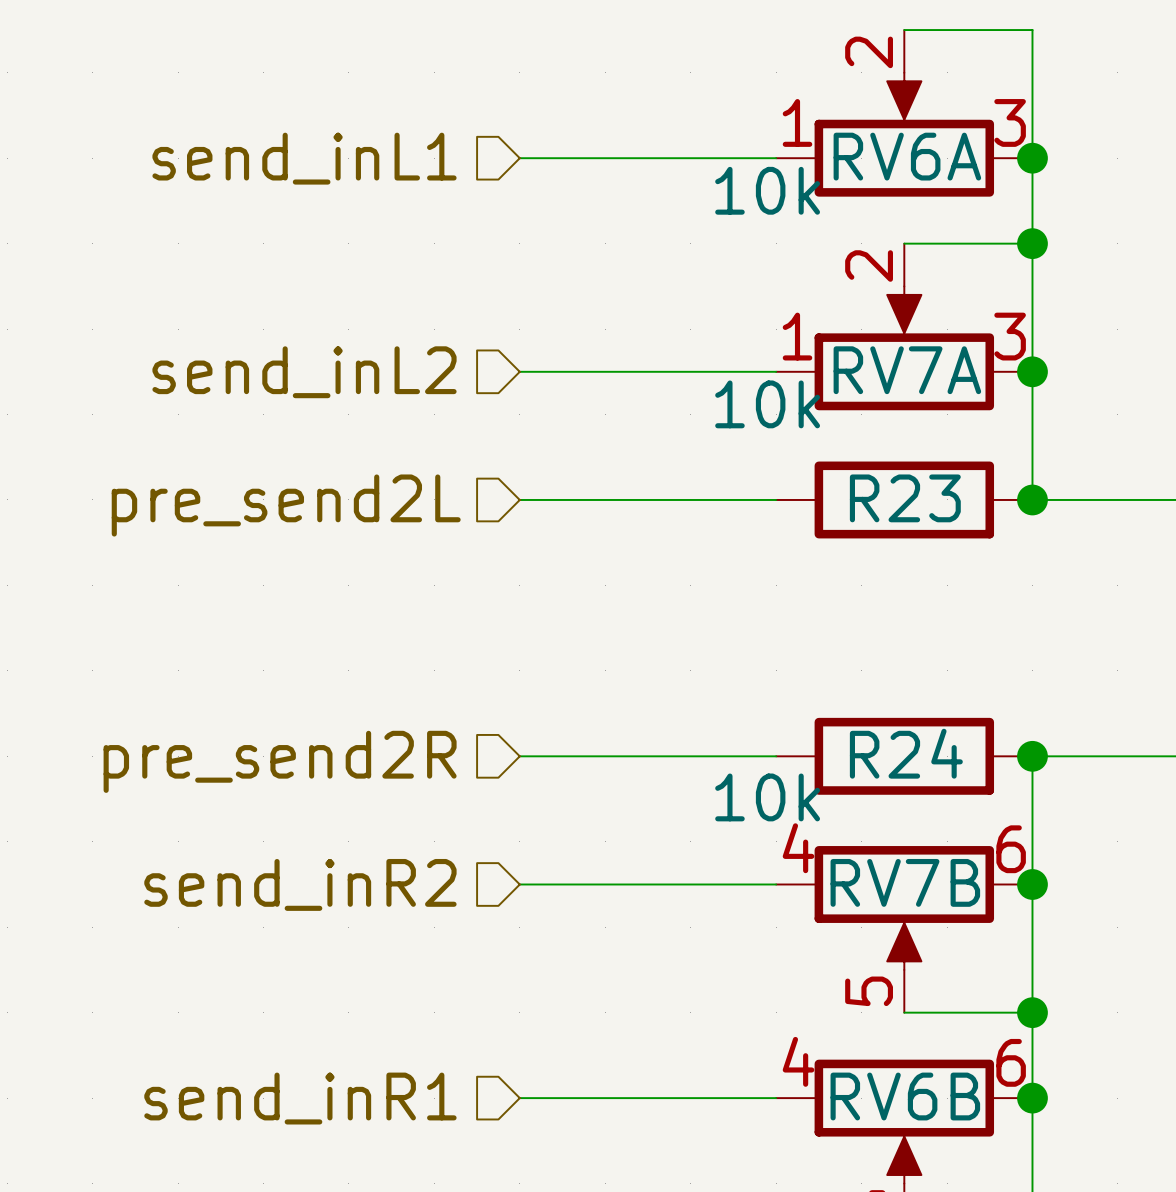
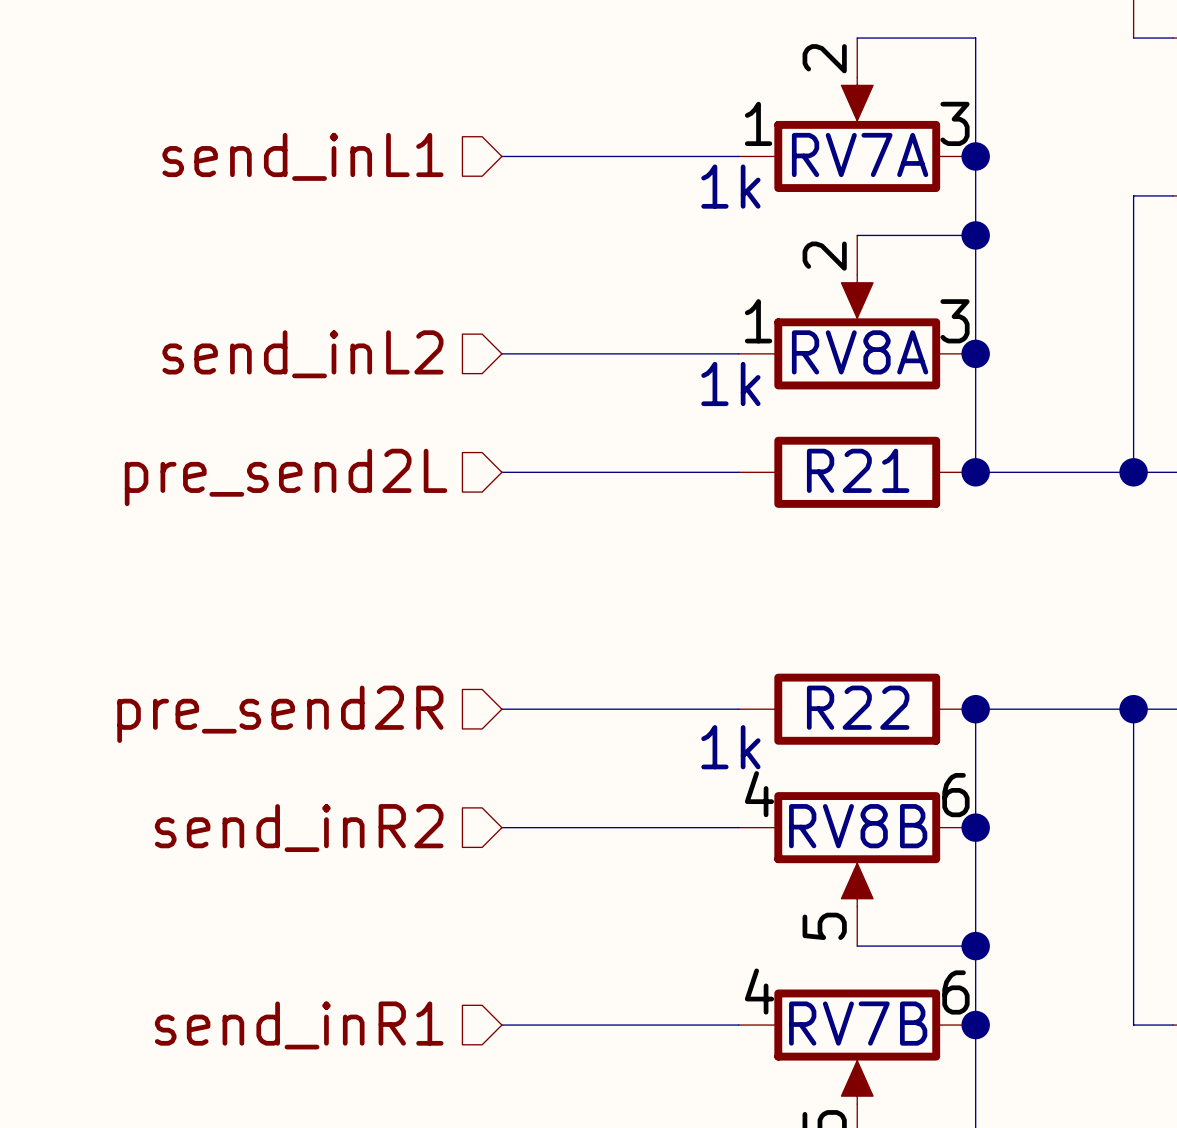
RV6A name: RV6A (907, 156) -> RV7A (860, 154)
RV6A value: 10k (767, 190) -> 1k (730, 186)
RV7A name: RV7A (907, 370) -> RV8A (860, 352)
RV7A value: 10k (767, 404) -> 1k (730, 383)
R23 name: R23 (905, 498) -> R21 (858, 470)
R24 name: R24 (906, 753) -> R22 (858, 707)
R24 value: 10k (767, 797) -> 1k (730, 747)
RV7B name: RV7B (905, 882) -> RV8B (858, 826)
RV6B name: RV6B (905, 1096) -> RV7B (858, 1023)

